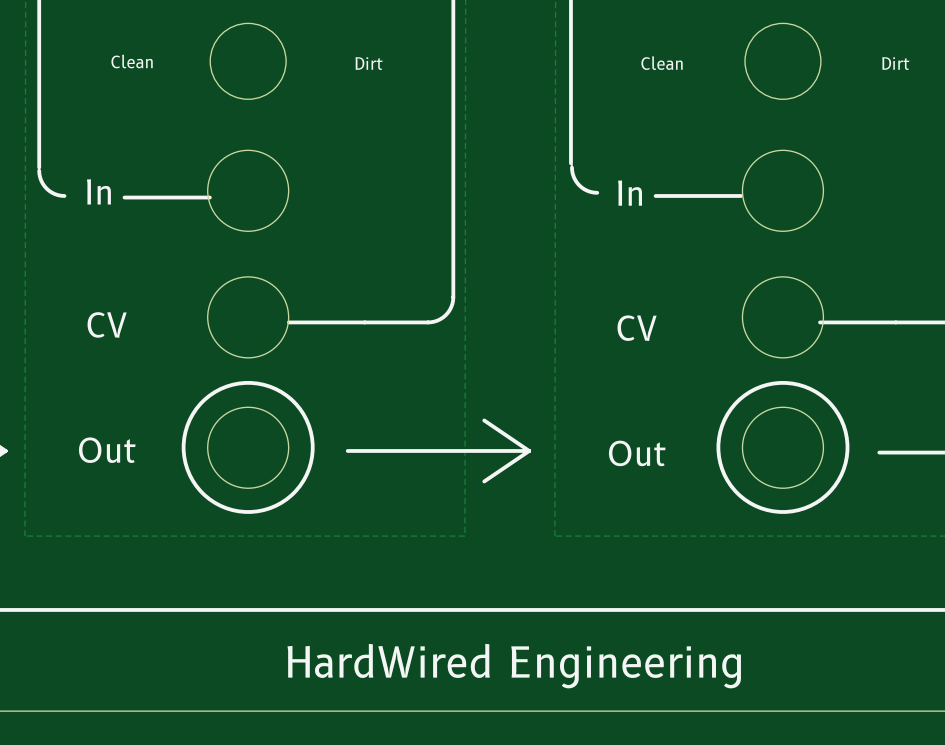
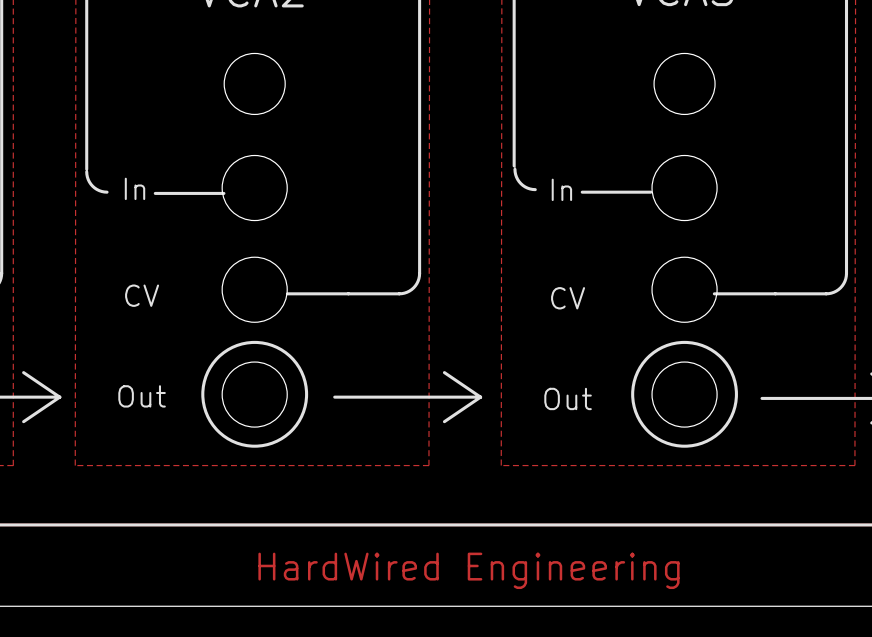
text: Clean (132, 61) -> none
text: Dirt (369, 63) -> none
text: Clean (662, 63) -> none
text: Dirt (895, 63) -> none
text: HardWired Engineering (514, 666) -> none

